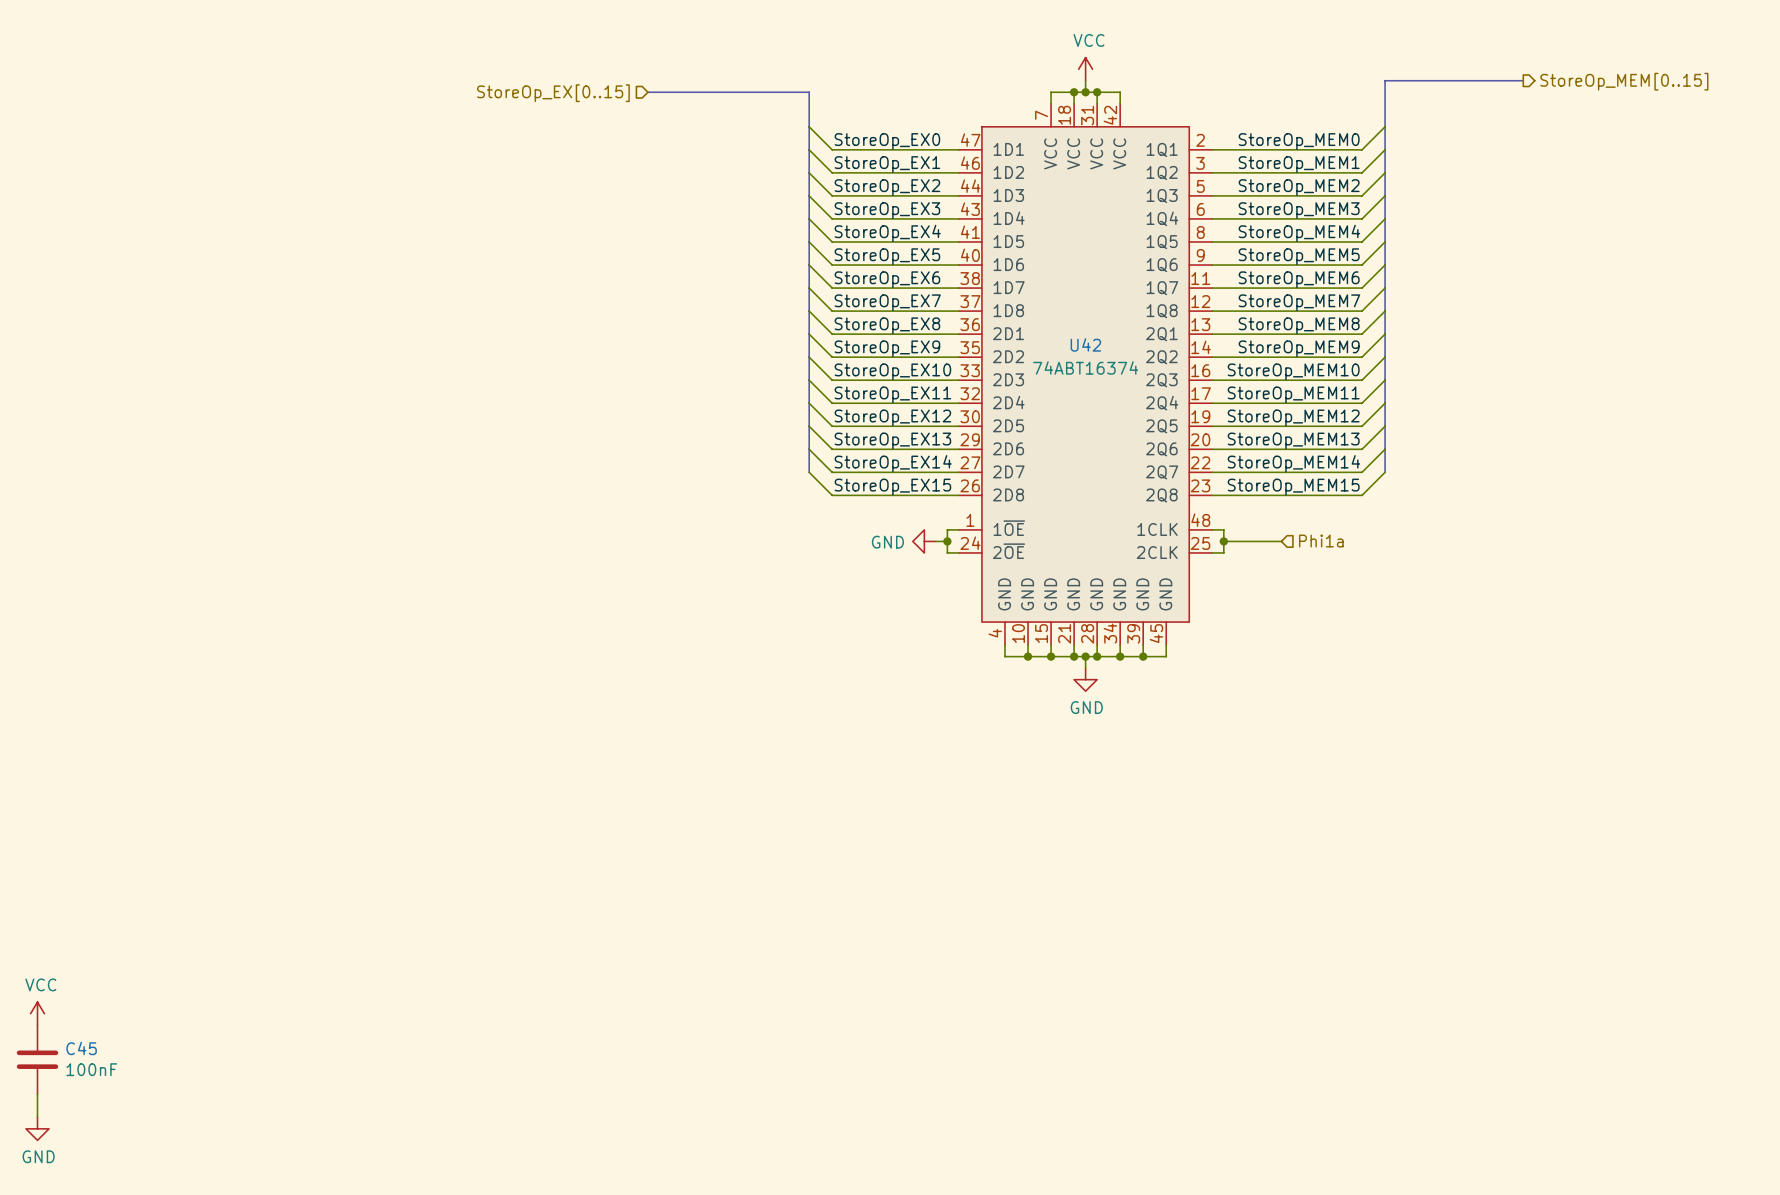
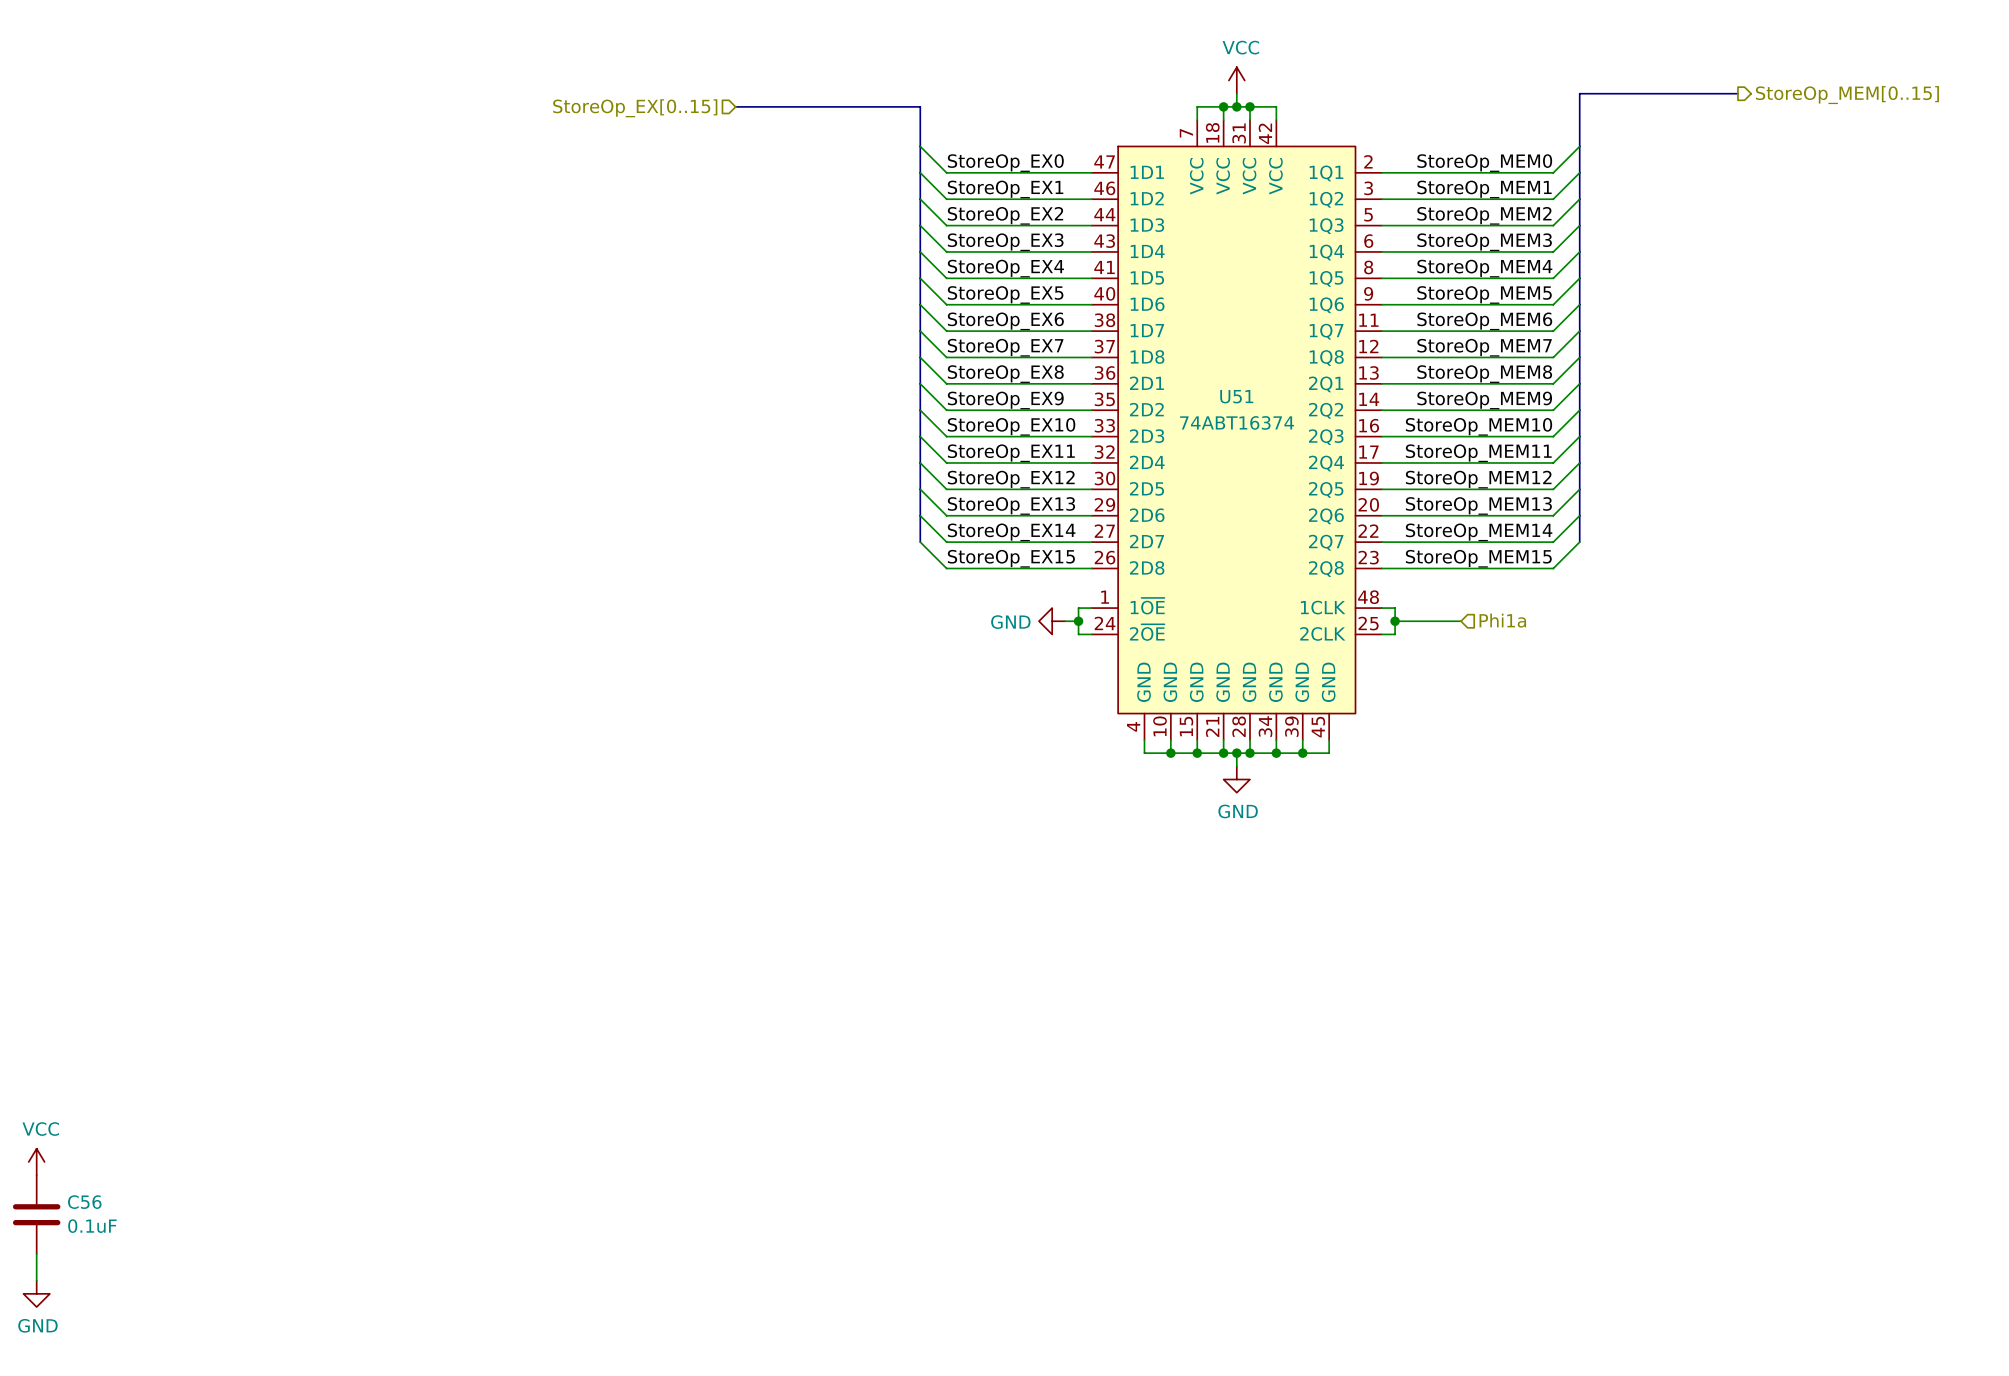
U42 name: U42 (1085, 344) -> U51 (1236, 396)
C45 name: C45 (81, 1048) -> C56 (84, 1202)
C45 value: 100nF (91, 1069) -> 0.1uF (92, 1226)

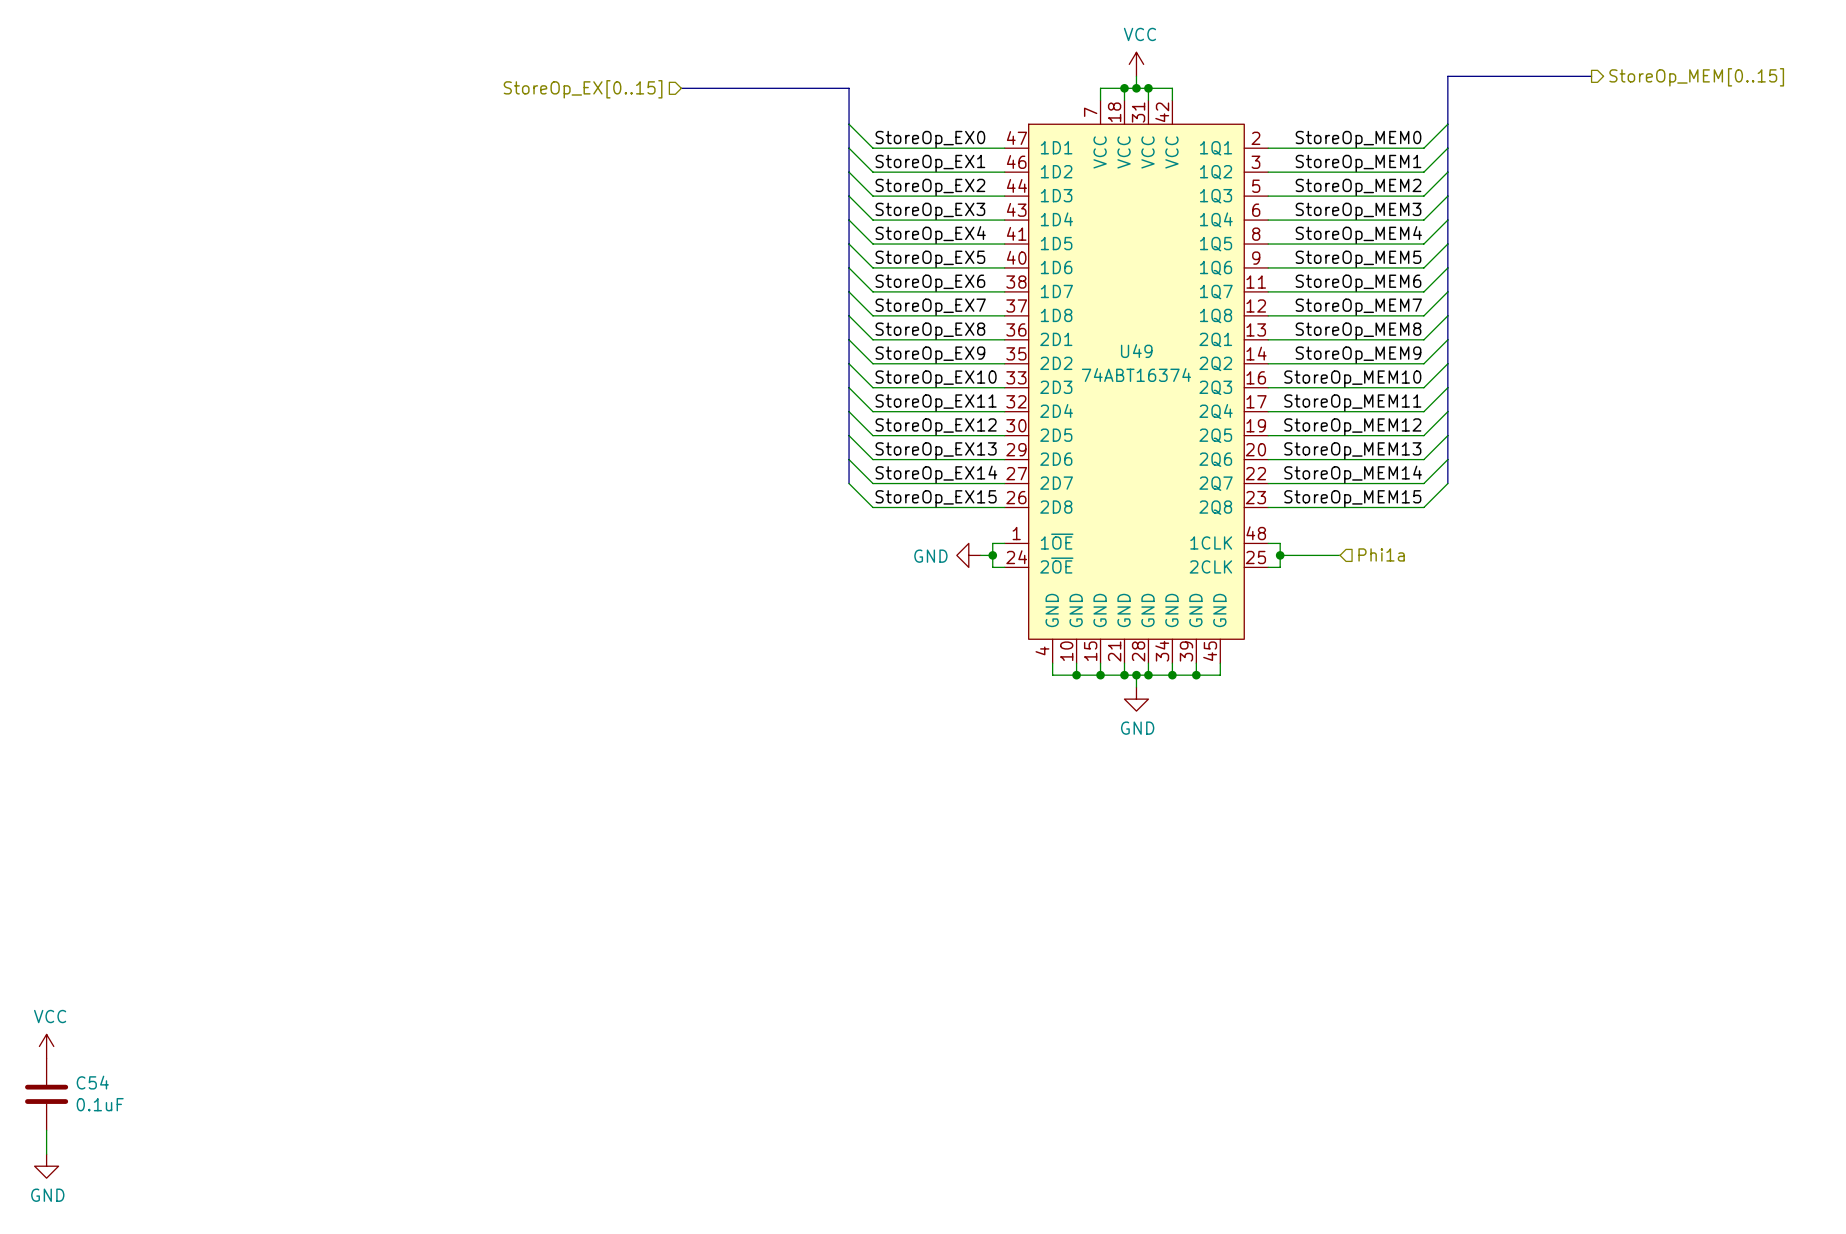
U51 name: U51 (1236, 396) -> U49 (1136, 351)
C56 name: C56 (84, 1202) -> C54 (92, 1082)

